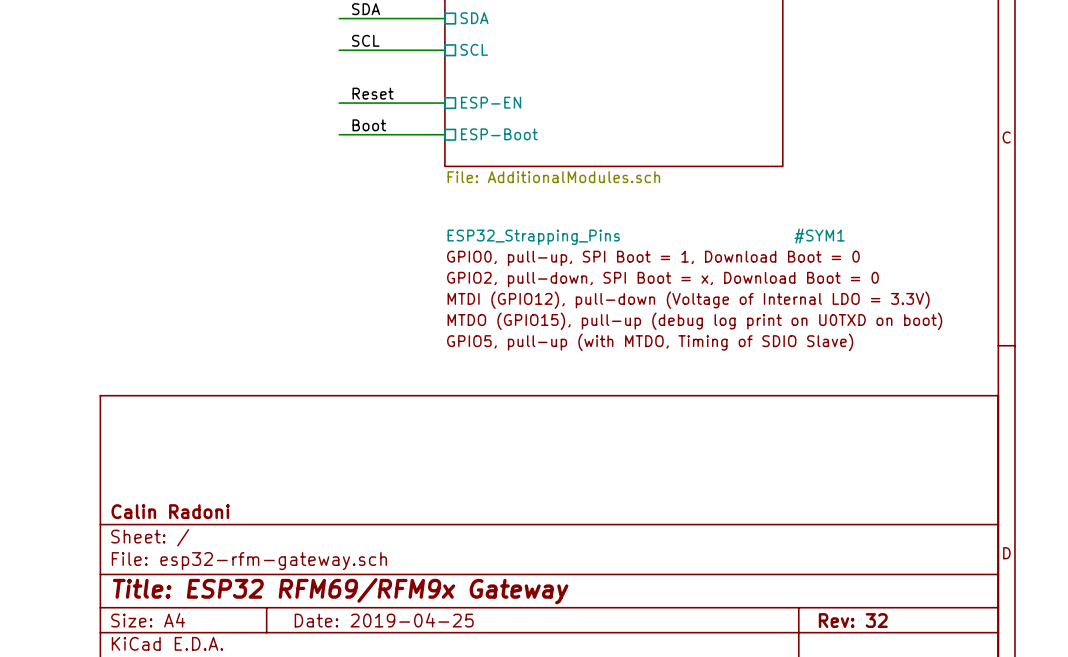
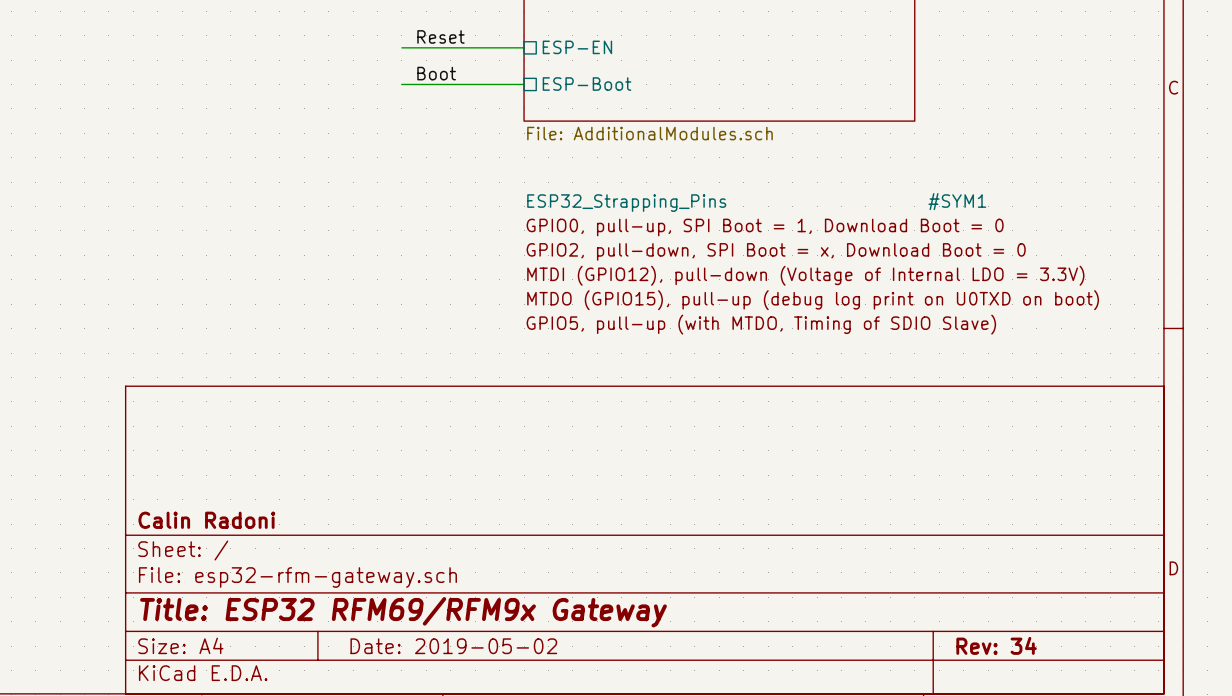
title block: Date: 2019-04-25 (384, 620) -> Date: 2019-05-02 (453, 646)
title block: Rev: 32 (853, 620) -> Rev: 34 (996, 645)

